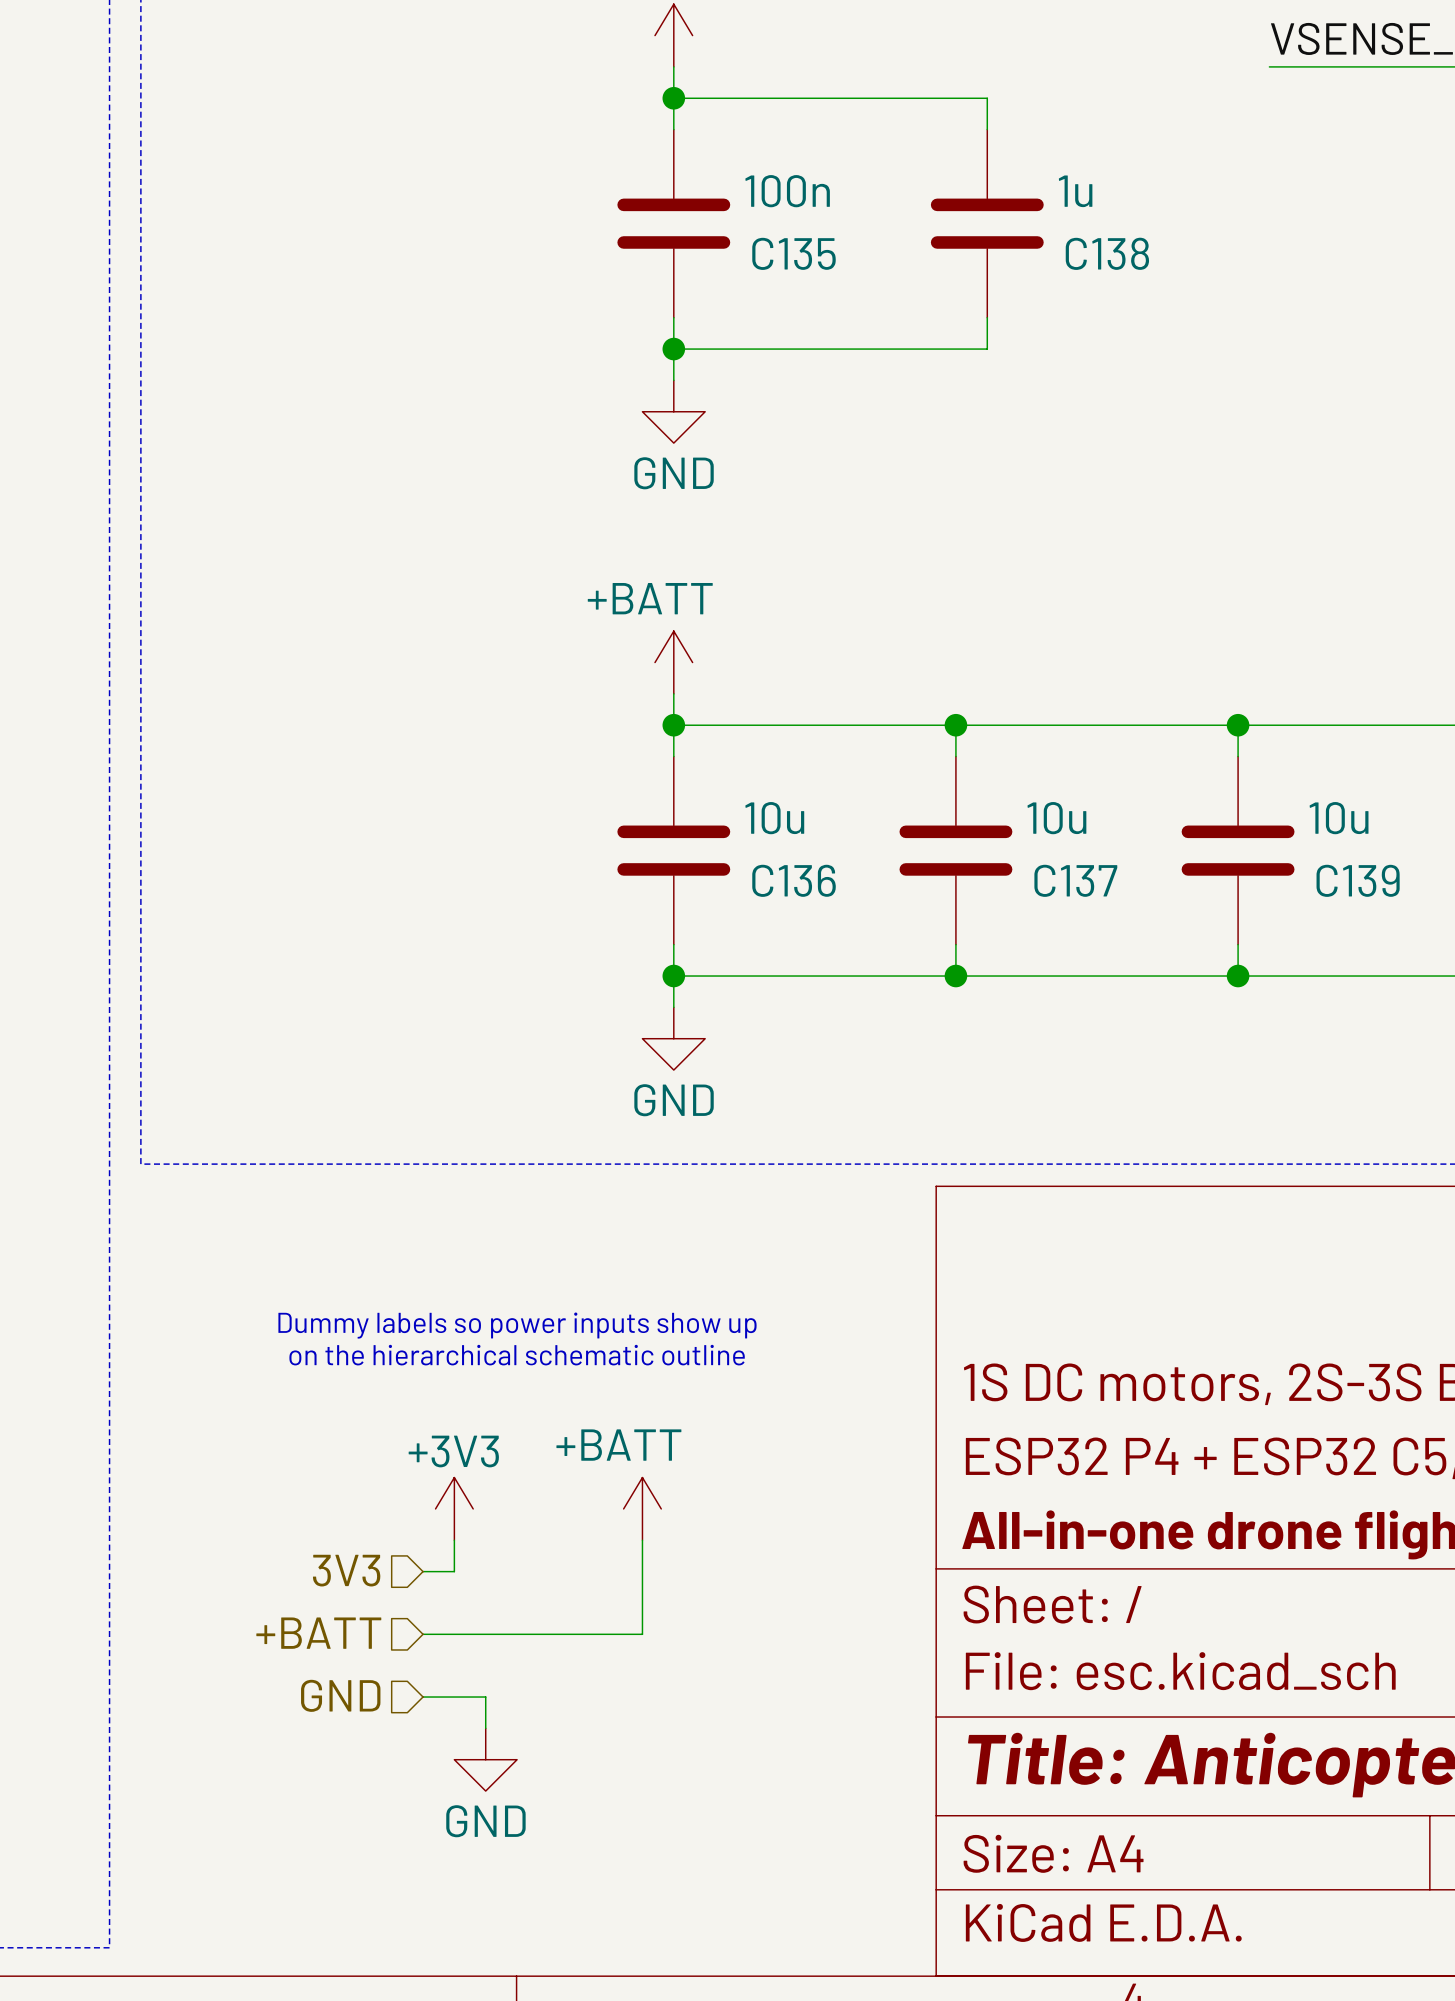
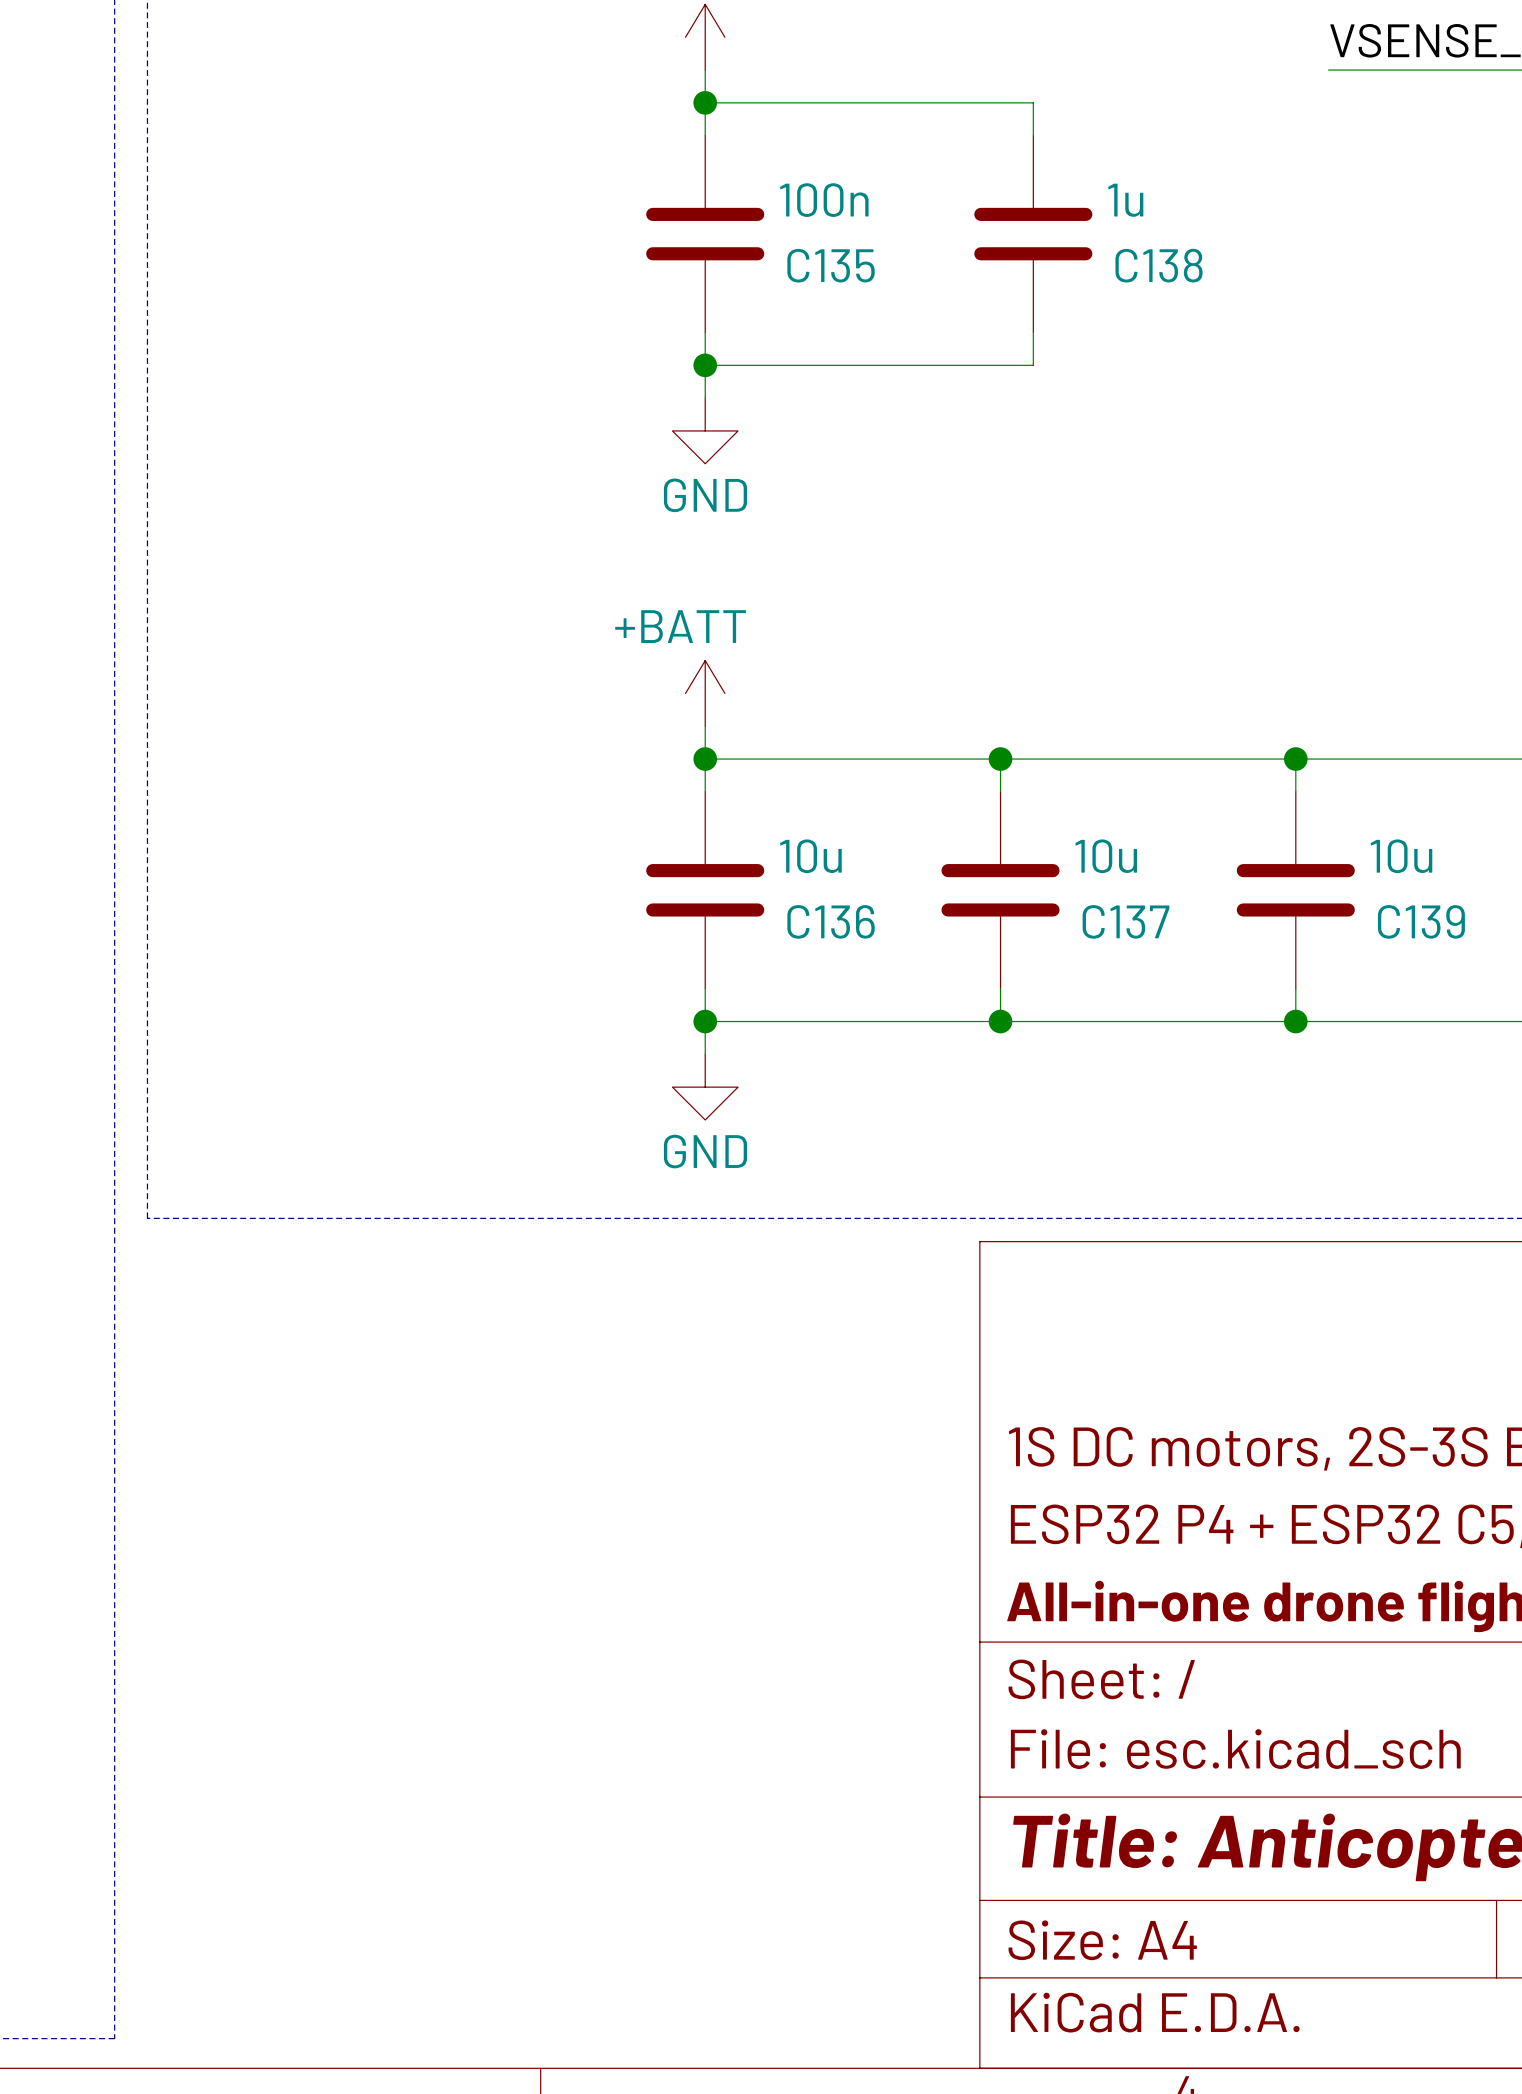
text: Dummy labels so power inputs show up (517, 1325) -> none
text: on the hierarchical schematic outline (517, 1355) -> none
power symbol: +3V3 (454, 1508) -> none
power symbol: +BATT (642, 1508) -> none
wire: (454, 1540) (454, 1571) (423, 1571) -> none
wire: (642, 1540) (642, 1634) (423, 1634) -> none
hierarchical label: 3V3 (346, 1570) -> none
hierarchical label: +BATT (318, 1633) -> none
hierarchical label: GND (340, 1695) -> none
wire: (423, 1697) (485, 1697) (485, 1728) -> none
power symbol: GND (485, 1759) -> none

